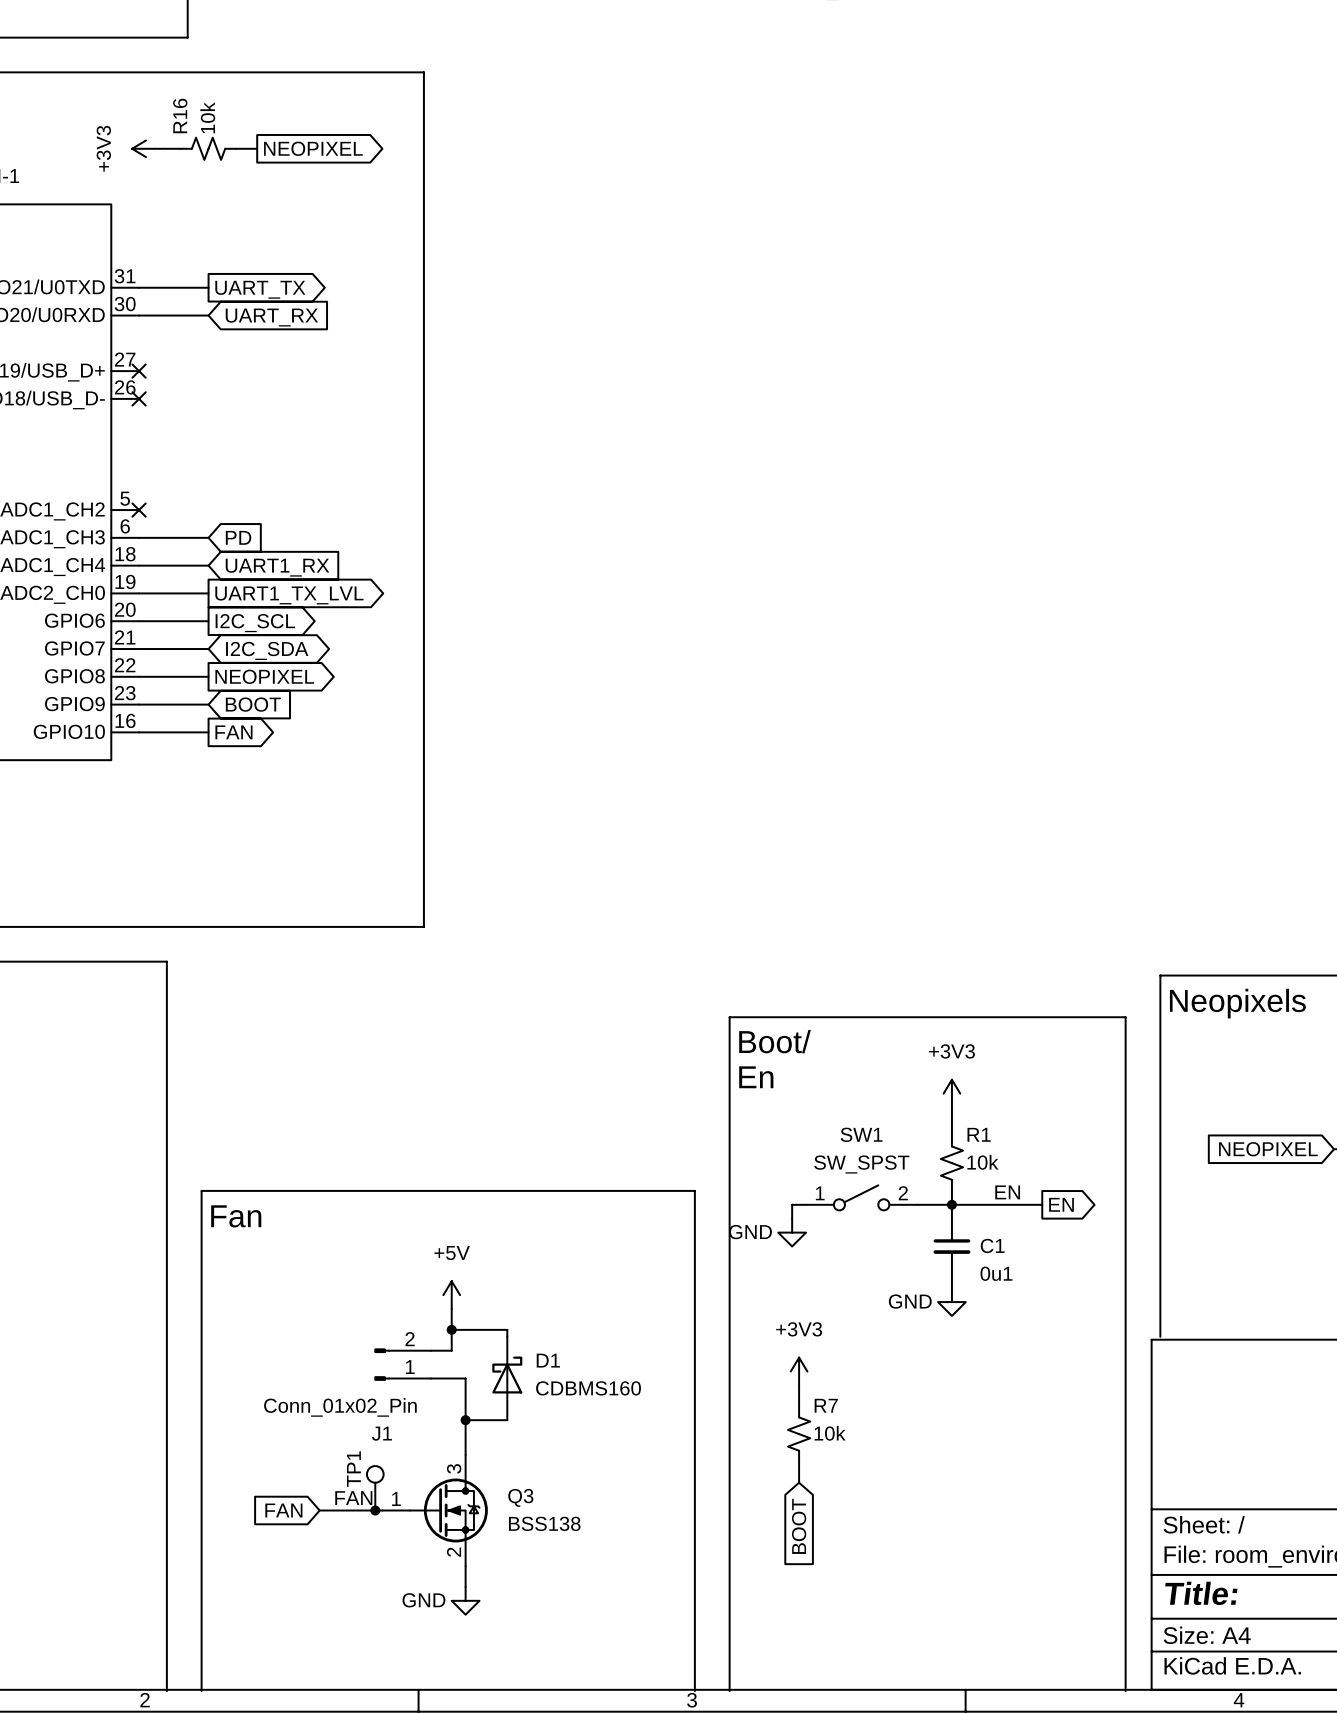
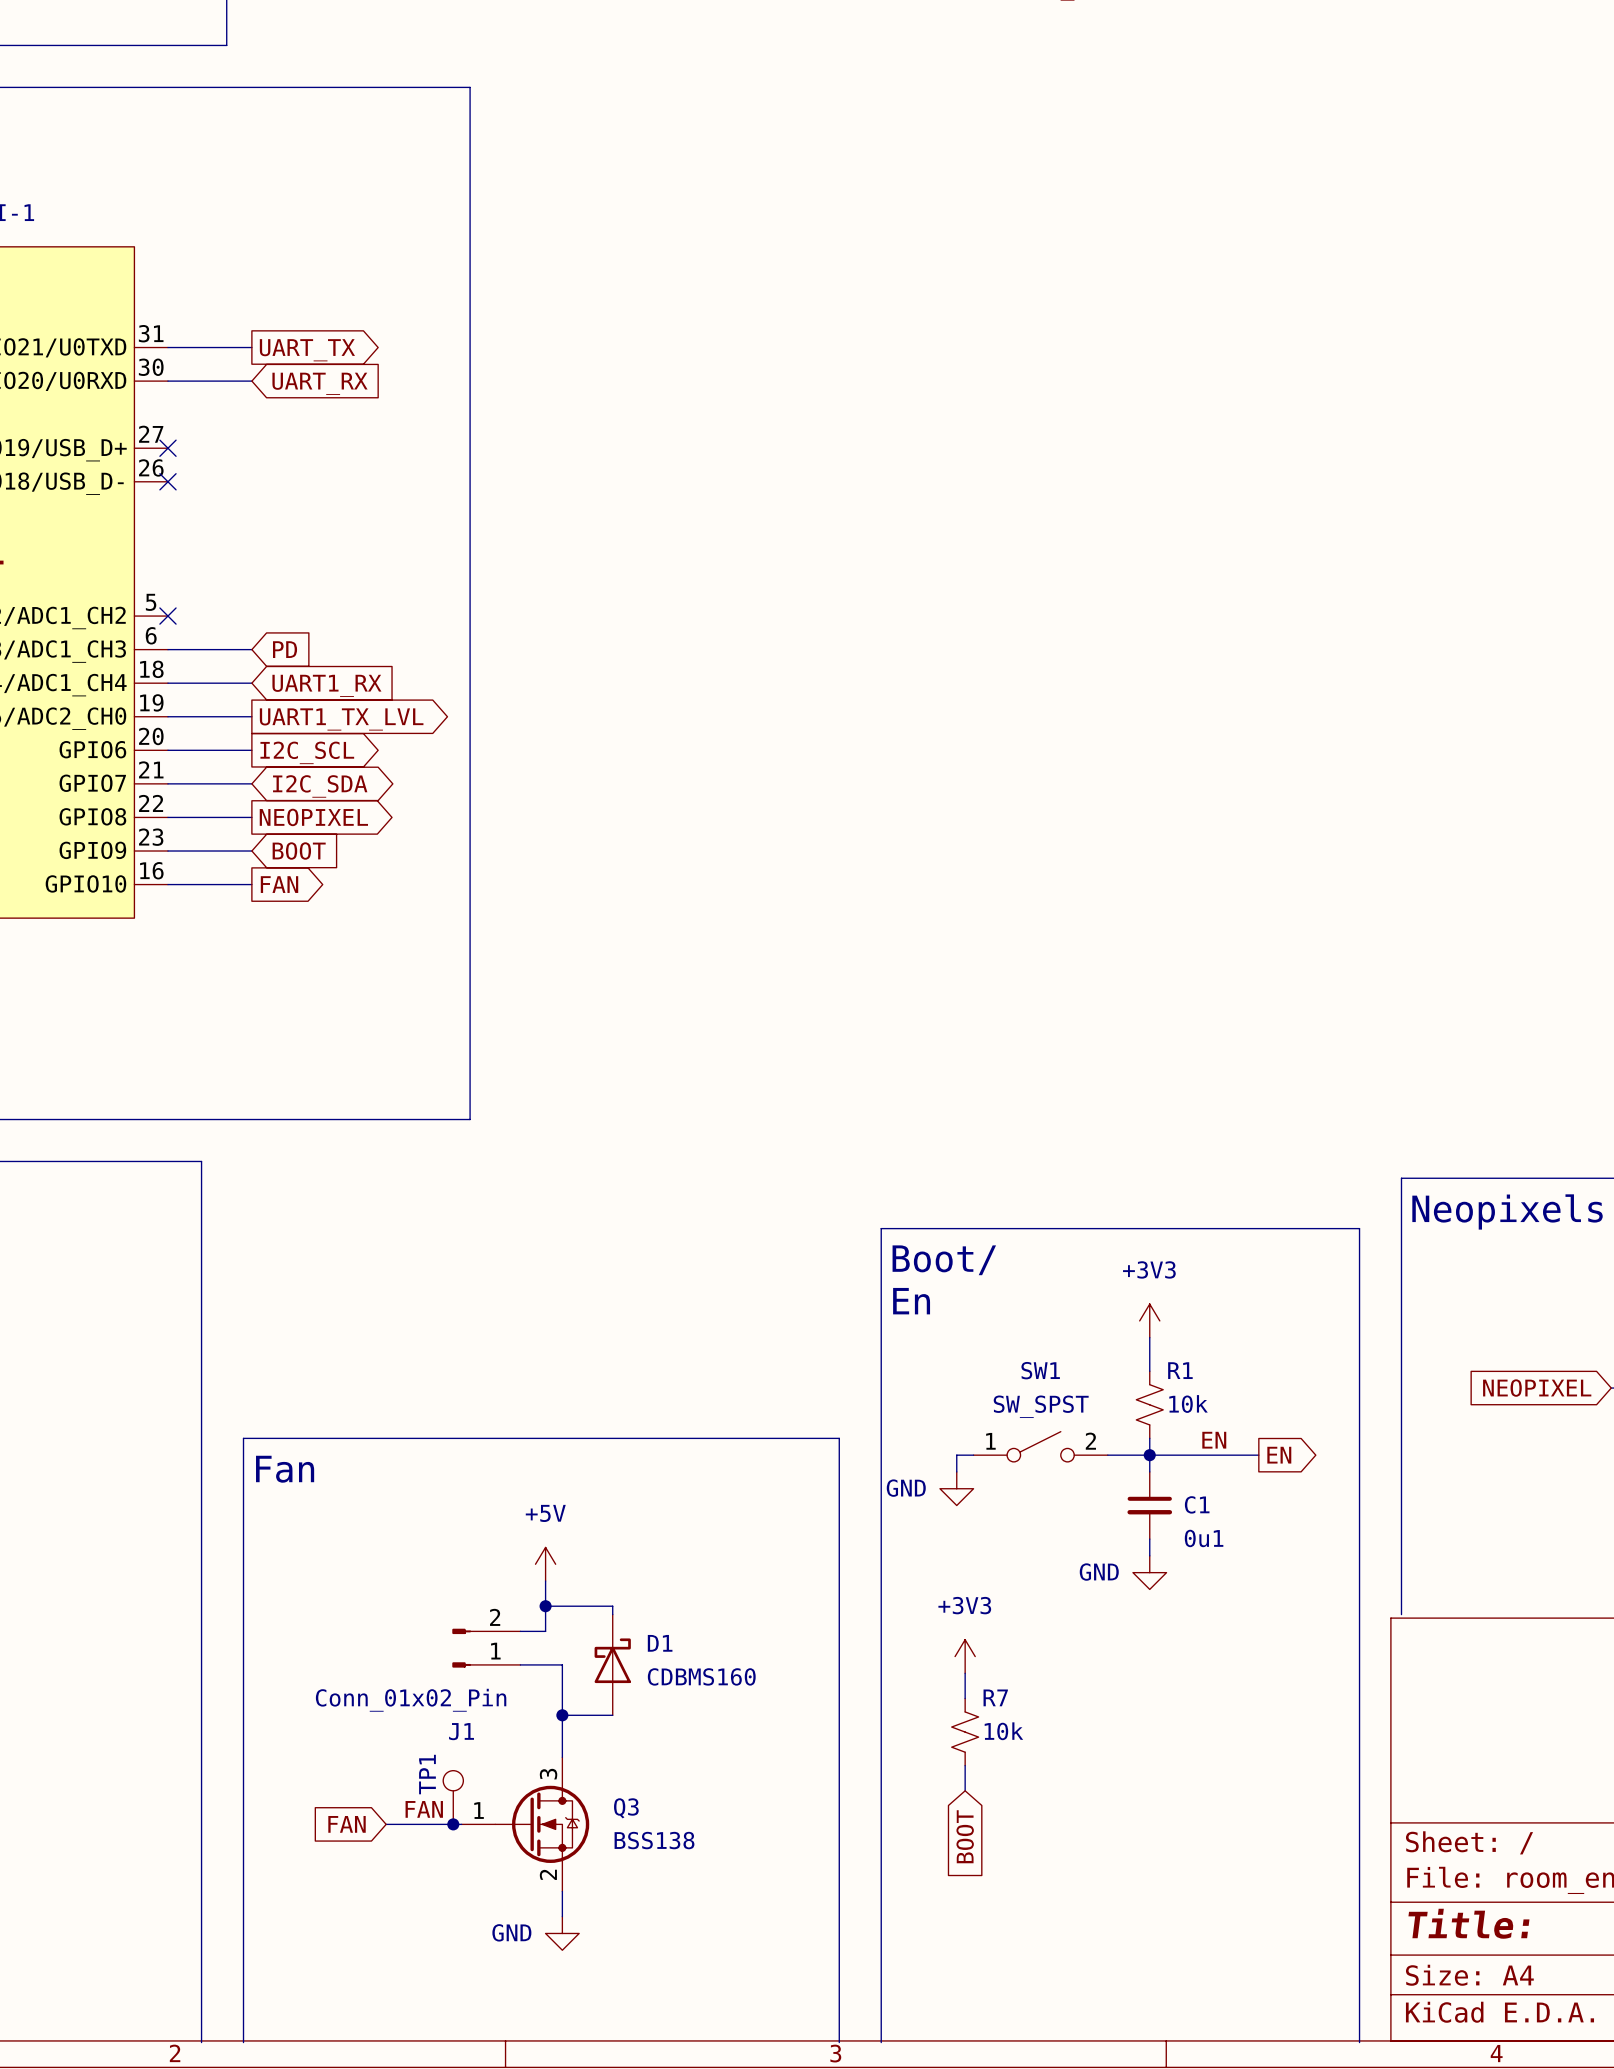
line: (389, 72) (423, 72) (423, 926) (389, 926) -> (470, 87) (470, 1119)
power symbol: +3V3 (146, 148) -> none
wire: (159, 148) (180, 148) -> none
R16: 10k (208, 148) -> none
wire: (236, 148) (257, 148) -> none
global label: NEOPIXEL (313, 148) -> none

